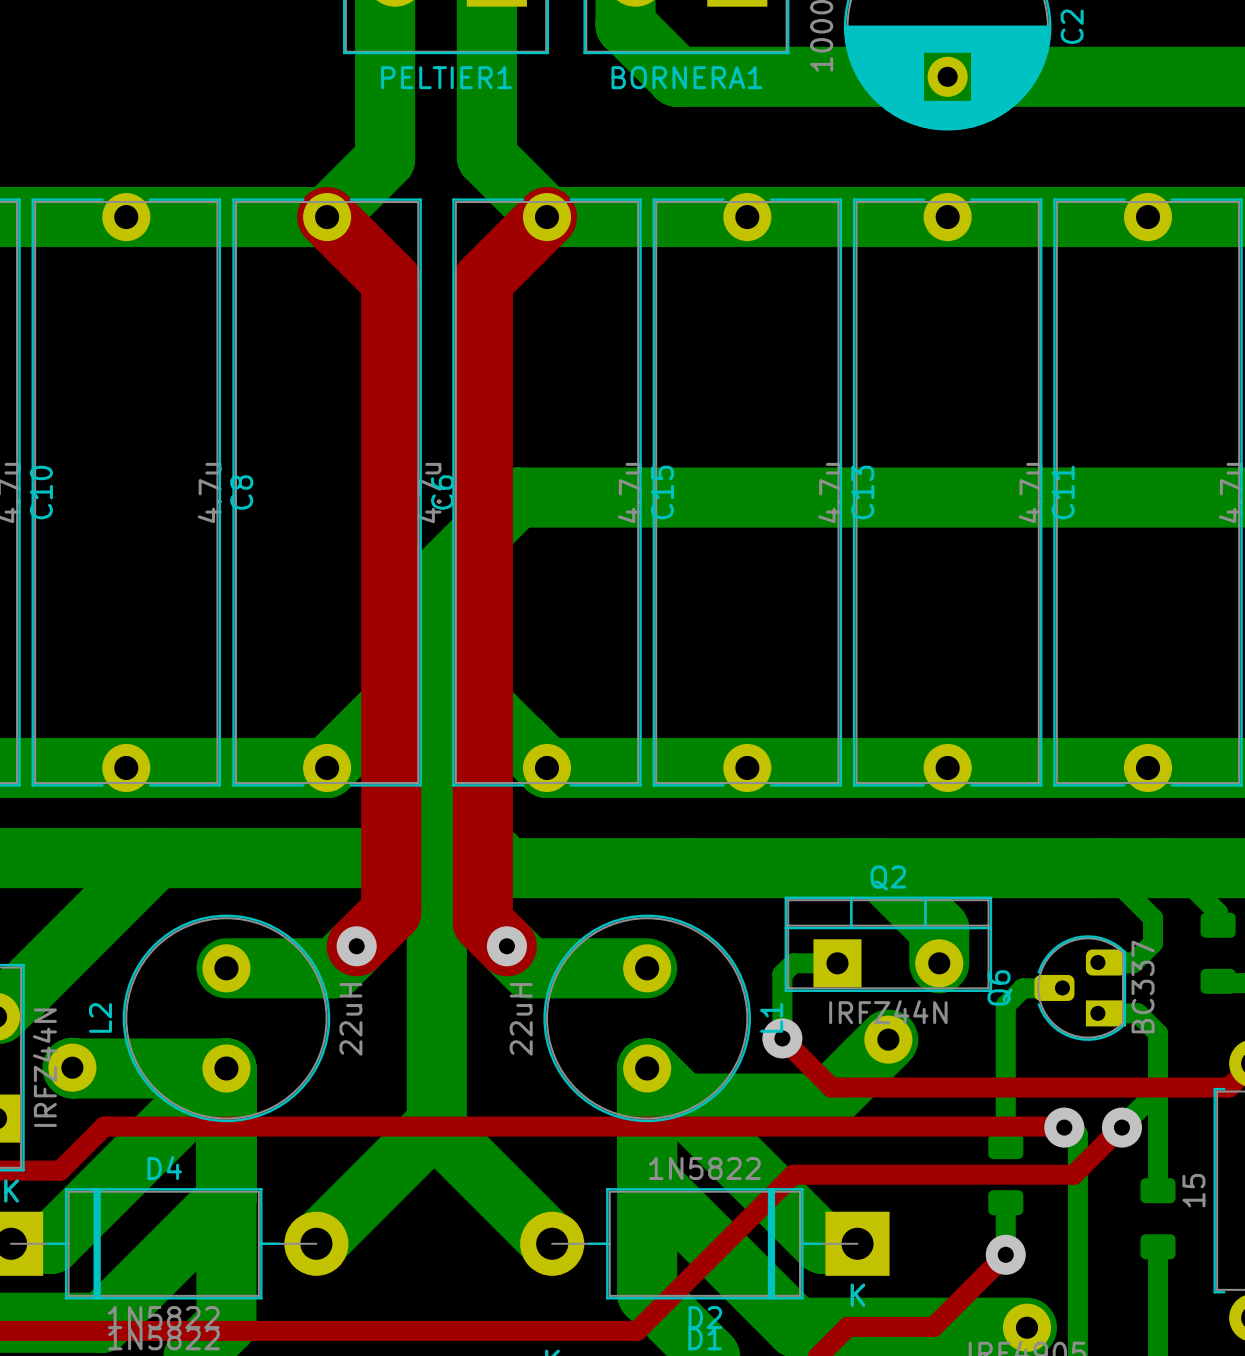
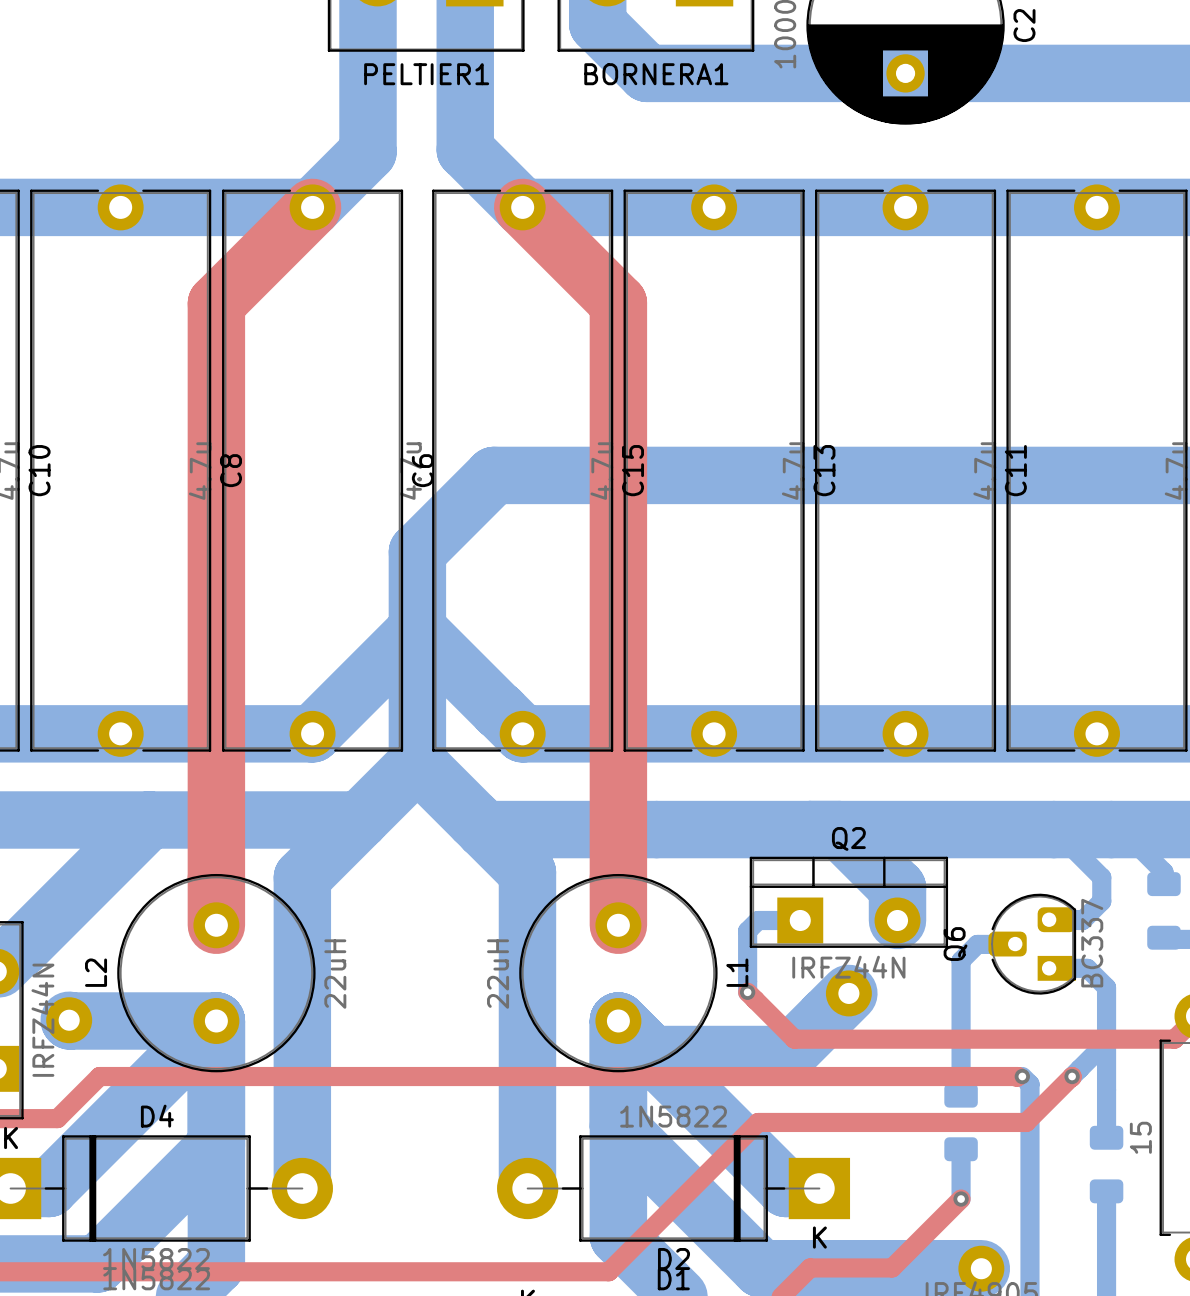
top track: (327, 217) (391, 281) (391, 911) (356, 946) -> (312, 207) (216, 303) (216, 925)
top track: (546, 217) (482, 281) (482, 922) (506, 946) -> (522, 207) (618, 303) (618, 925)
bottom track: (436, 798) (436, 1128) (552, 1243) -> (484, 829) (527, 872) (527, 1188)
bottom track: (356, 946) (334, 968) (226, 968) -> none
via: (356, 946) -> none
bottom track: (506, 946) (528, 968) (647, 968) -> none
via: (506, 946) -> none
via size: [762, 1018, 803, 1059] -> [739, 984, 756, 1000]
via size: [1044, 1107, 1085, 1148] -> [1014, 1068, 1030, 1085]
via size: [1101, 1107, 1143, 1148] -> [1064, 1068, 1080, 1085]
bottom track: (436, 1123) (316, 1243) -> (359, 819) (302, 877) (302, 1188)
via size: [985, 1234, 1026, 1275] -> [953, 1191, 969, 1207]

